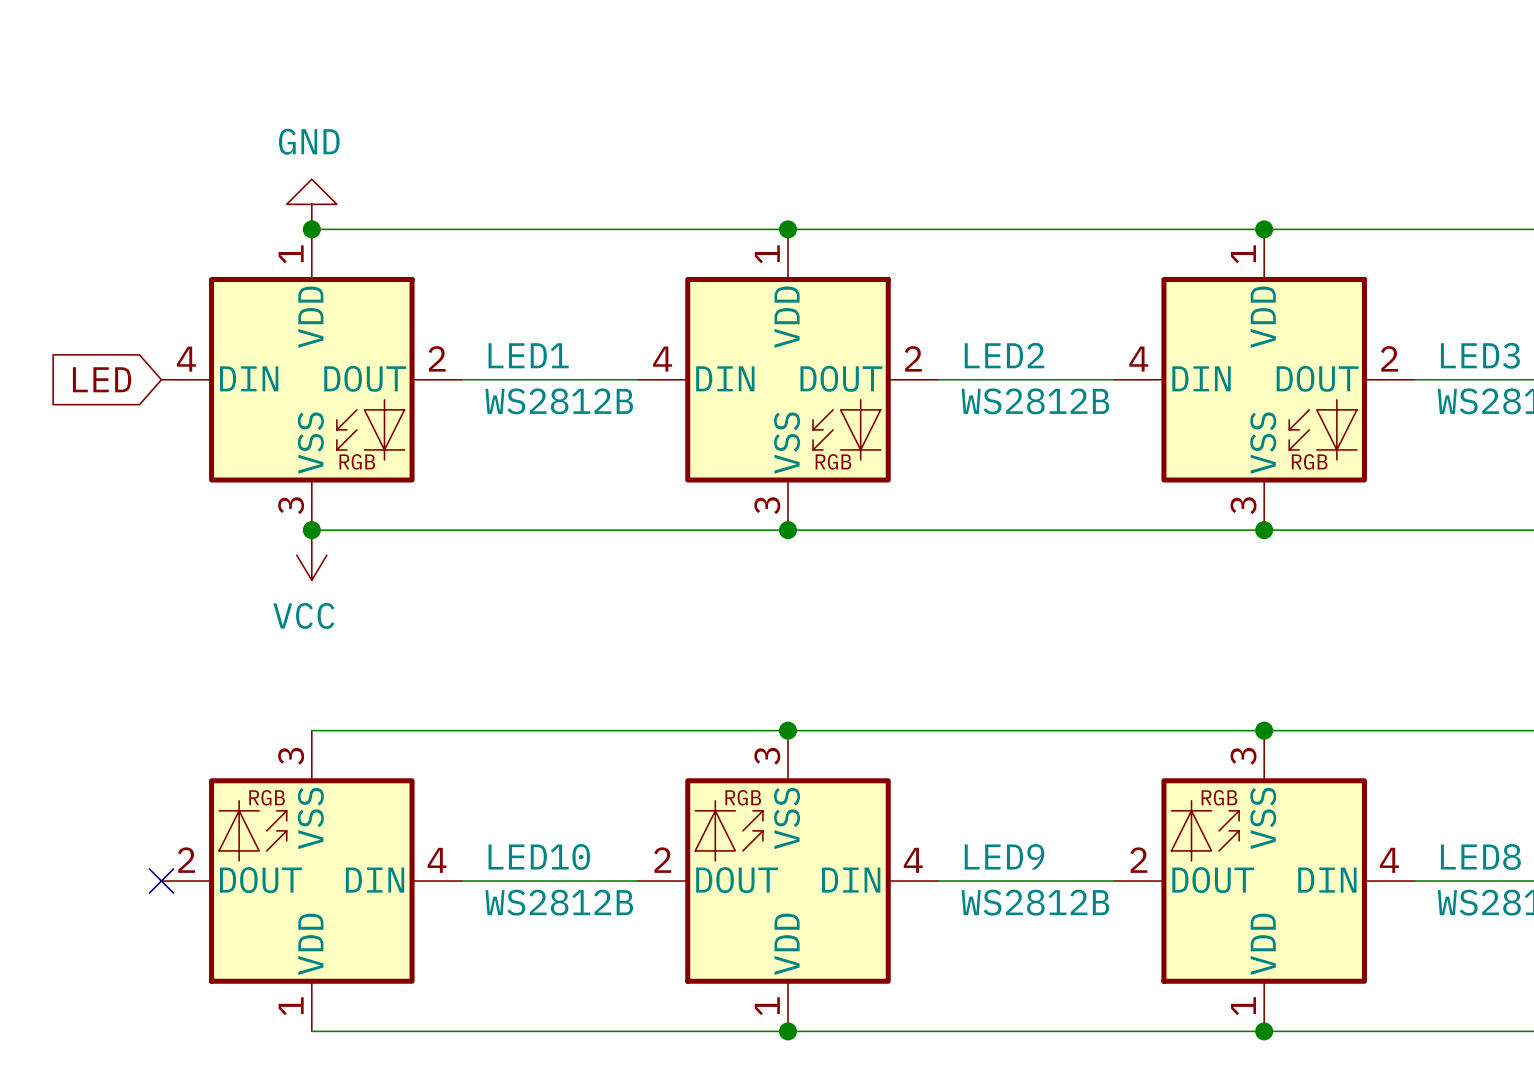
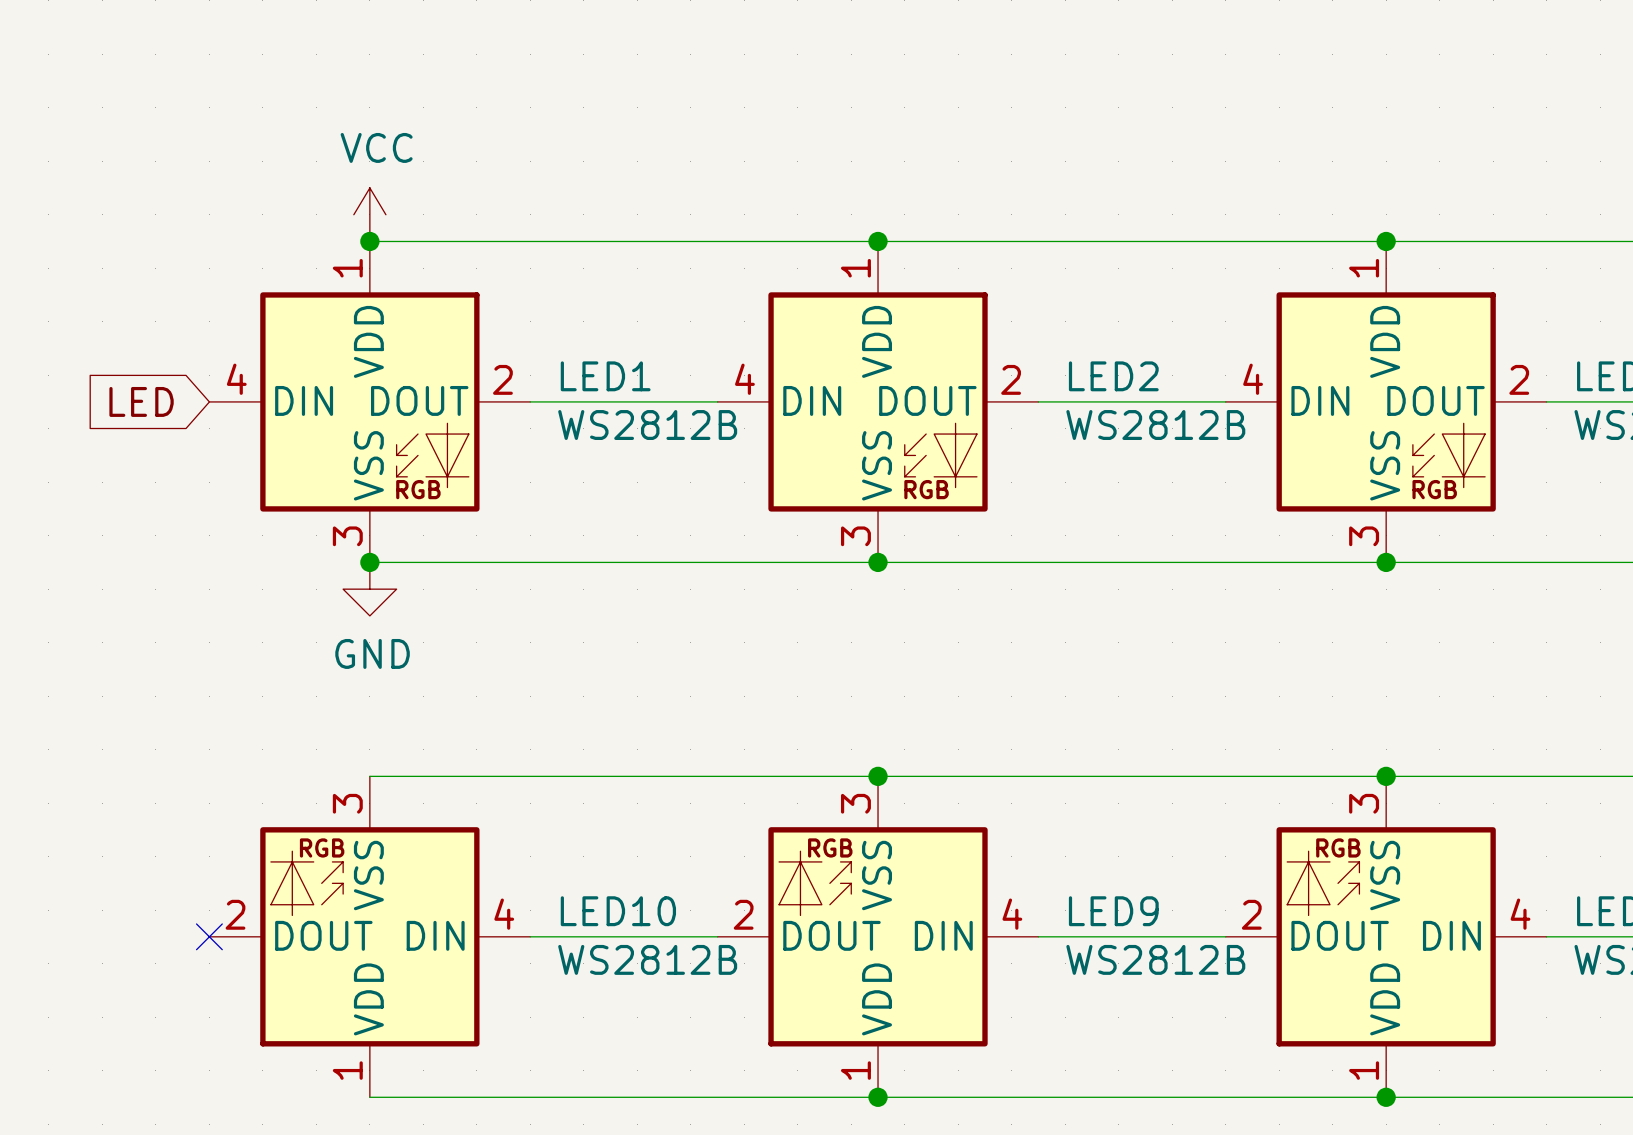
power symbol: GND (311, 204) -> VCC (369, 214)
power symbol: VCC (311, 555) -> GND (369, 589)

